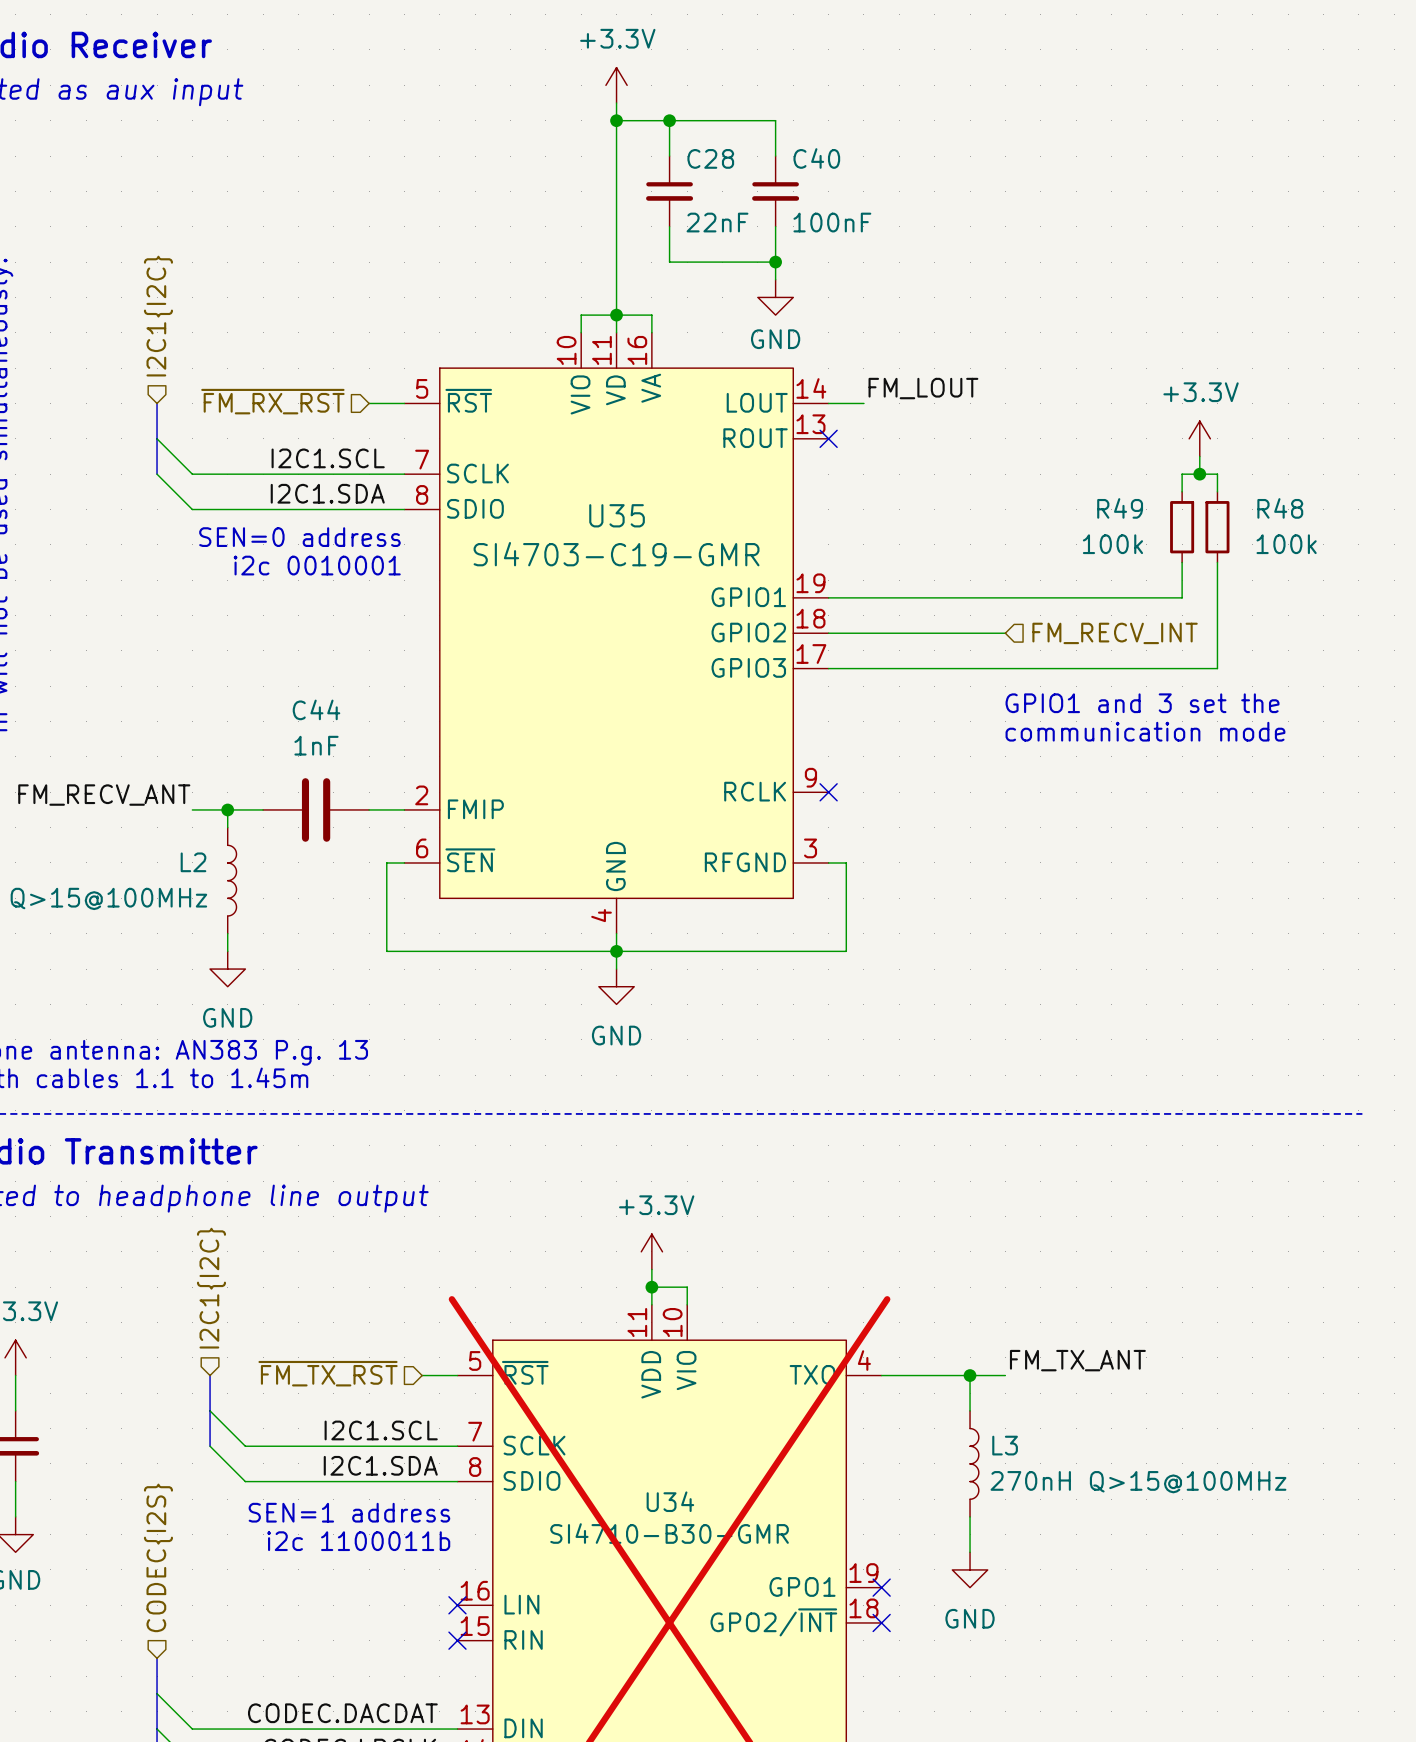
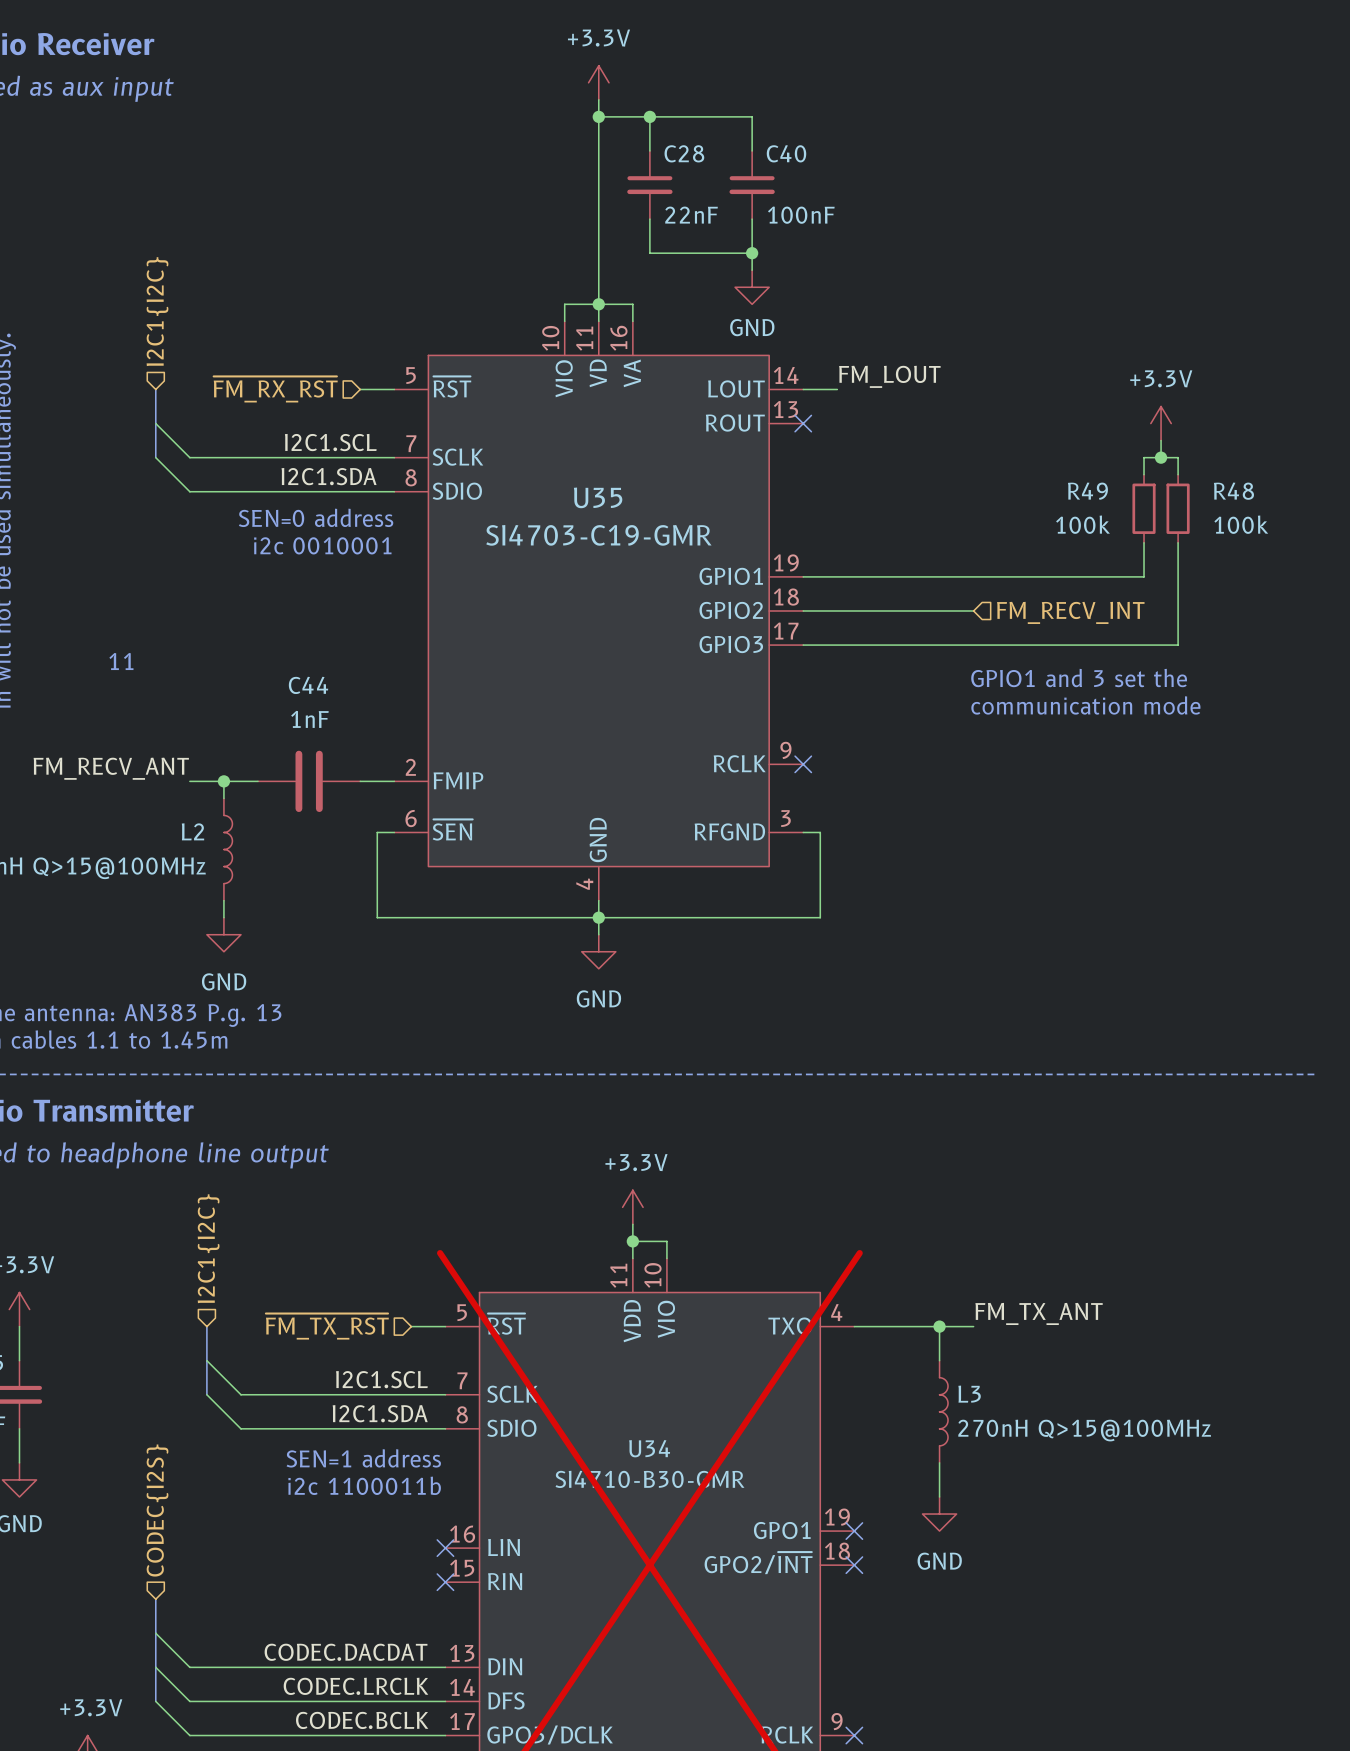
text: none -> 11 (121, 661)

